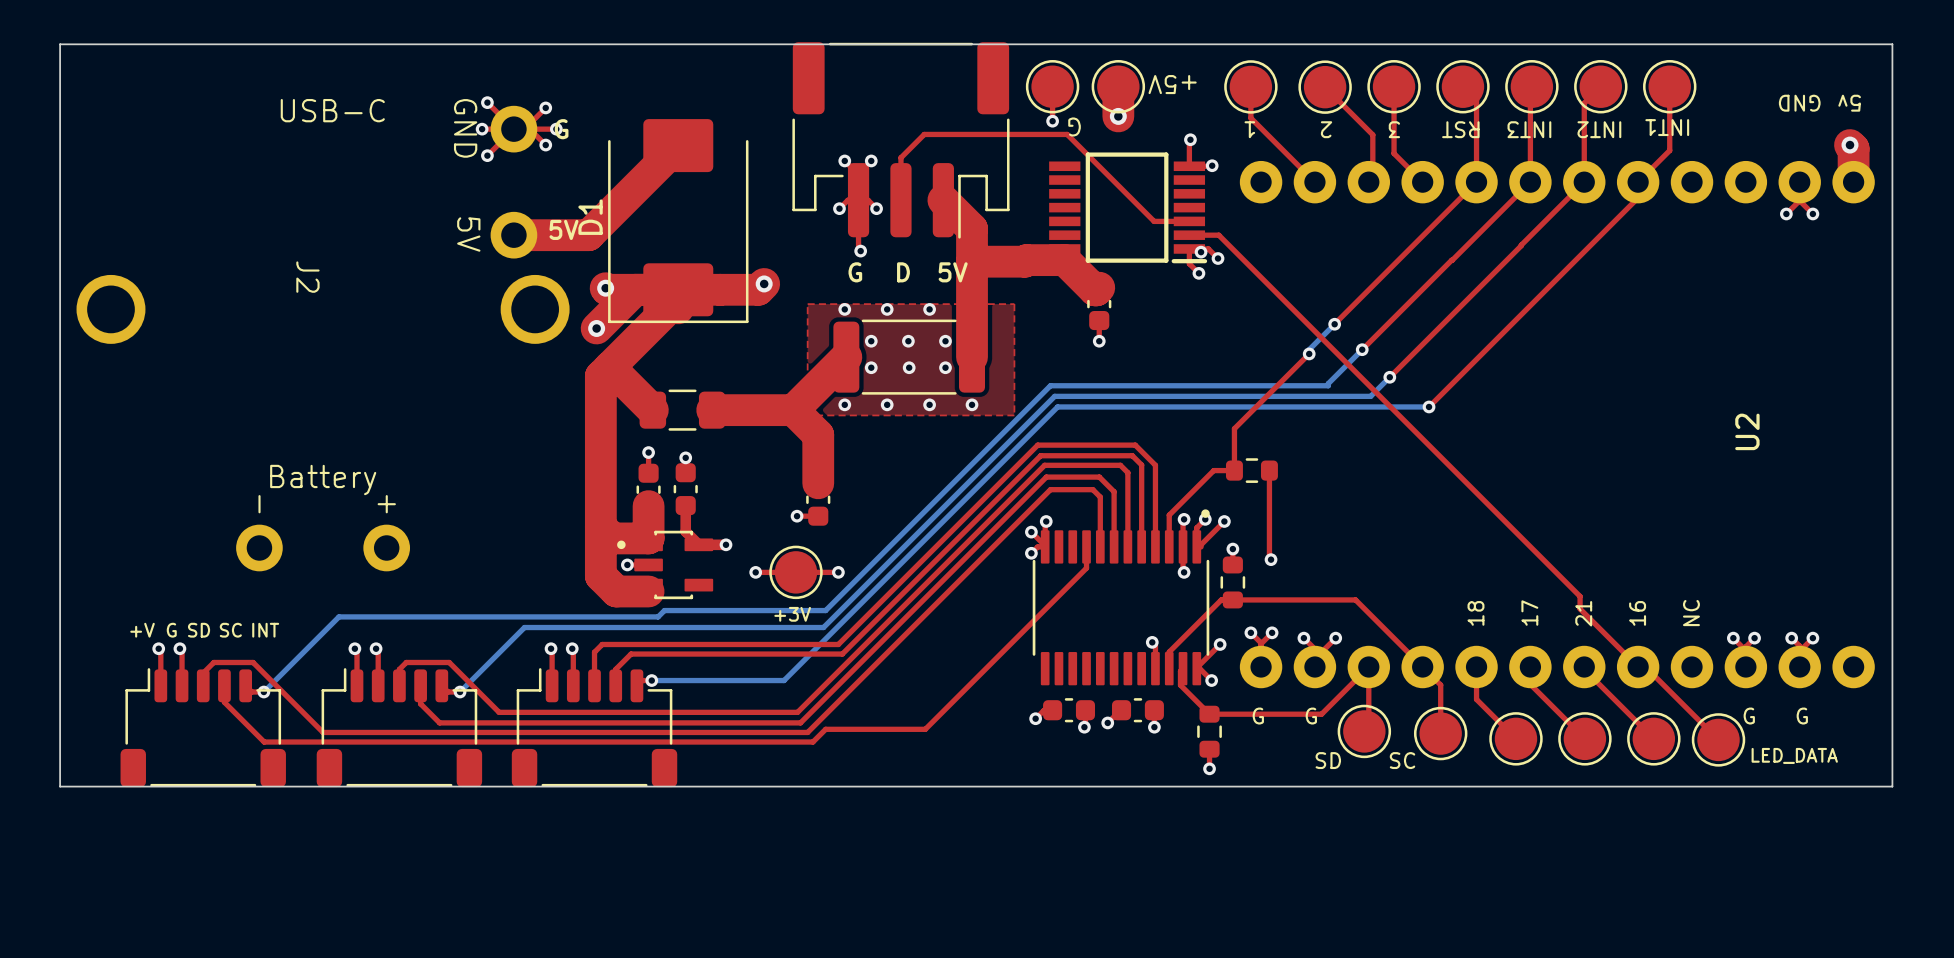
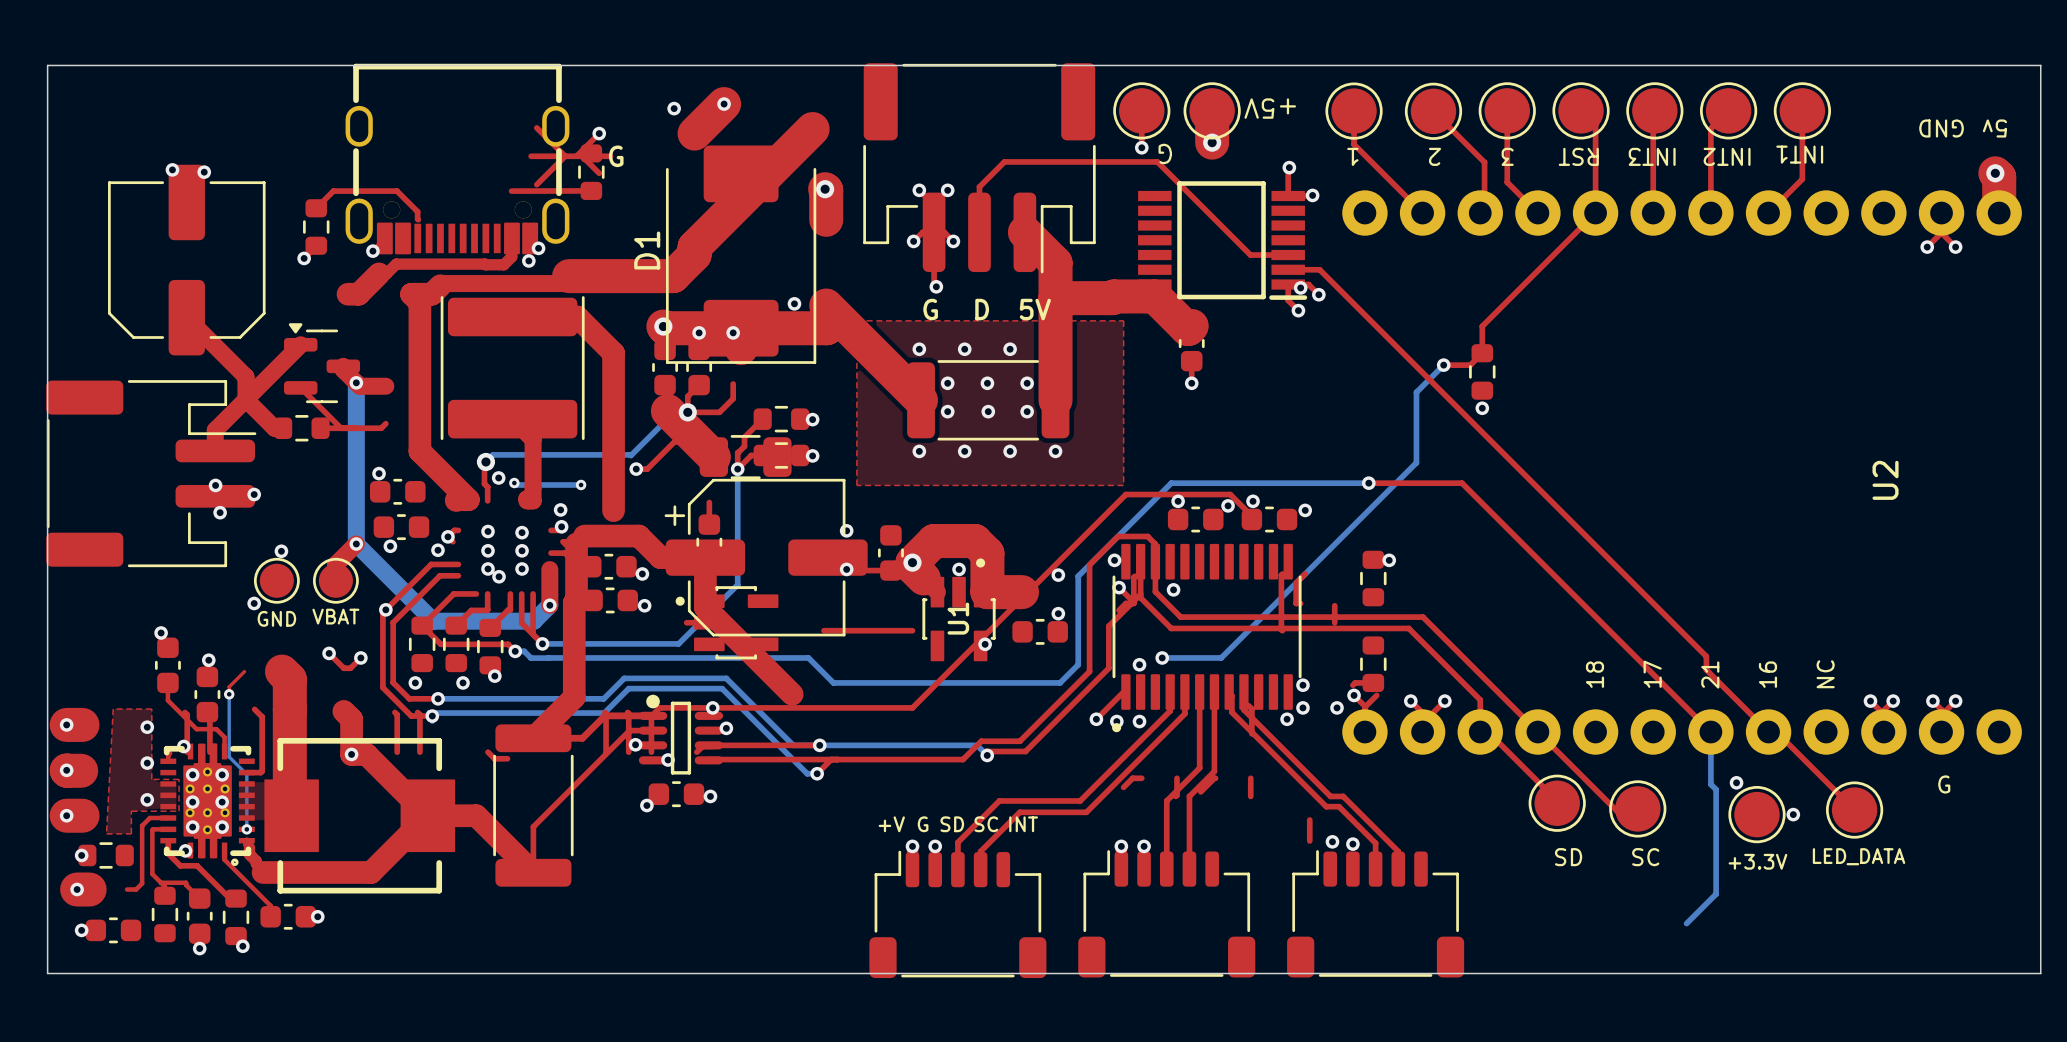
board edge: (60, 44) (60, 786) (1892, 786) -> (79, 65) (47, 65) (47, 973) (2040, 973) (2040, 860)
top track: none -> (724, 104) (694, 133)
via: none -> (724, 104)
via: none -> (674, 108)
via: (487, 102) -> none
top track: none -> (812, 129) (694, 247) (694, 254) (673, 276) (569, 276)
via: (482, 129) -> none
via: (556, 129) -> none
part: none -> (457, 159)
via: none -> (172, 169)
via: none -> (204, 172)
part: none -> (591, 172)
via: (545, 145) -> none
top track: (678, 145) (588, 235) (513, 235) -> none
via: (487, 155) -> none
top track: none -> (825, 189) (826, 219)
via: none -> (825, 189)
top track: none -> (511, 191) (591, 190)
top track: none -> (316, 208) (333, 191) (397, 191) (417, 211) (418, 219)
top track: (1530, 182) (1362, 349) -> none
top track: (1584, 182) (1389, 377) -> none
part: none -> (316, 227)
top track: (1638, 197) (1429, 406) -> none
top track: none -> (511, 238) (511, 256) (503, 264) (396, 264) (386, 273) (379, 273) (358, 294) (347, 294)
via: none -> (538, 248)
via: none -> (372, 251)
via: none -> (304, 258)
part: none -> (186, 260)
via: none -> (528, 260)
text: 5V (563, 229) -> none
top track: none -> (569, 283) (442, 283) (431, 294) (411, 294) (419, 302) (419, 451) (468, 499) (456, 500)
via: none -> (794, 303)
top track: none -> (826, 305) (921, 400) (921, 384)
top track: none -> (186, 317) (245, 376) (245, 399) (274, 428) (283, 428)
top track: none -> (512, 317) (577, 317) (613, 353) (613, 510)
via: (764, 283) -> none
top track: (1370, 287) (1334, 324) -> (1482, 326) (1482, 353) (1470, 365) (1443, 365)
top track: (635, 289) (596, 328) -> none
via: none -> (699, 332)
via: none -> (733, 332)
top track: (678, 298) (600, 376) (600, 575) (616, 591) (648, 591) -> none
top zone outline: (807, 304) (1014, 304) (1014, 415) (807, 415) (807, 304) -> (856, 320) (856, 485) (1123, 485) (1123, 320) (856, 320)
top track: none -> (300, 344) (215, 430) (215, 450)
part: none -> (322, 363)
top track: none -> (343, 366) (343, 369) (359, 386) (385, 386)
part: none -> (665, 367)
part: none -> (699, 367)
part: none -> (512, 368)
via position: (596, 328) -> (687, 412)
part: none -> (1482, 371)
J2: (323, 338) -> none
bottom track: none -> (356, 382) (356, 544) (433, 621) (533, 621) (549, 605)
via: none -> (356, 382)
top track: none -> (733, 383) (733, 398) (719, 412) (687, 412) (687, 396) (699, 385)
top track: none -> (300, 387) (341, 428)
bottom track: (1362, 349) (1328, 385) (1050, 385) (825, 610) (664, 610) (658, 616) -> (987, 755) (977, 745) (793, 745) (726, 678) (719, 678)
via: (1362, 349) -> none
top track: (1309, 353) (1234, 428) (1234, 470) (1213, 470) (1169, 515) (1169, 546) -> none
bottom track: none -> (1416, 396) (1416, 462) (1221, 657) (1162, 657)
via: (1309, 353) -> none
top track: (846, 357) (793, 410) -> none
via: none -> (1482, 408)
bottom track: none -> (687, 412) (674, 412) (631, 455) (493, 454) (485, 461)
top track: none -> (512, 419) (533, 439) (533, 500) (526, 498) (526, 500)
top track: none -> (762, 419) (744, 437) (744, 446) (737, 452) (737, 469) (751, 455) (762, 455)
part: none -> (781, 419)
via: none -> (812, 419)
bottom track: (1389, 377) (1370, 396) (1054, 396) (823, 627) (524, 627) (460, 692) -> none
via: (1389, 377) -> none
top track: none -> (385, 423) (381, 428) (320, 428)
part: none -> (301, 428)
top track: none -> (689, 441) (674, 441) (647, 469) (636, 469)
bottom track: (1429, 406) (1057, 406) (784, 680) (651, 680) -> none
via: (1429, 406) -> none
part: none -> (781, 455)
via: none -> (812, 455)
top track: (712, 410) (793, 410) -> none
top track: (793, 410) (818, 435) (818, 483) -> none
top track: none -> (485, 461) (484, 483) (487, 487) (487, 500)
via: none -> (485, 461)
via: none -> (636, 469)
bottom track: none -> (737, 469) (737, 584) (678, 643) (542, 643)
via: none -> (737, 469)
part: none -> (151, 473)
via: none -> (379, 473)
via: none -> (498, 477)
bottom track: none -> (514, 483) (516, 484) (581, 484)
via: none -> (514, 483)
top track: none -> (1368, 483) (1462, 483) (1710, 732)
bottom track: none -> (1368, 483) (1171, 483) (1078, 576) (1078, 664) (1060, 682) (833, 682) (808, 657) (548, 657)
via: none -> (1368, 483)
via: none -> (215, 485)
via: none -> (581, 484)
part: none -> (397, 491)
via: none -> (254, 494)
via: none -> (1178, 501)
via: none -> (1253, 501)
via: (648, 452) -> none
via: none -> (1228, 505)
via: (685, 457) -> none
via: none -> (560, 509)
via: none -> (1305, 510)
via: none -> (220, 512)
part: none -> (1195, 519)
top track: (1155, 468) (1155, 546) -> none
part: none -> (1269, 519)
part: (1251, 470) -> none
top track: (1269, 470) (1269, 558) (1271, 559) -> none
part: none -> (401, 527)
top track: none -> (561, 526) (558, 530) (551, 530)
via: none -> (561, 526)
top track: none -> (458, 530) (454, 530) (447, 536) (452, 541)
via: none -> (488, 531)
via: none -> (846, 530)
via: none -> (522, 532)
top track: none -> (584, 536) (638, 536) (660, 557) (705, 557) (705, 607) (792, 694)
via: none -> (447, 536)
top track: none -> (562, 541) (567, 546) (565, 541)
part: (685, 489) -> none
top track: none -> (356, 544) (335, 564) (335, 580)
via: none -> (356, 544)
top track: none -> (576, 544) (574, 697) (533, 738) (582, 738) (604, 715) (653, 715)
via: none -> (390, 546)
via: none -> (437, 550)
via: none -> (488, 550)
via: none -> (522, 550)
via: none -> (281, 551)
top track: none -> (551, 553) (576, 553)
part: none -> (766, 557)
top track: (685, 505) (685, 531) (698, 544) (726, 544) -> none
top track: (648, 506) (648, 538) (612, 538) (600, 526) -> none
via: none -> (1114, 560)
via: none -> (1389, 560)
top track: none -> (1140, 561) (1140, 597) (1171, 628) (1408, 628) (1480, 699) (1480, 732) (1488, 732) (1568, 812)
via: none -> (912, 562)
top track: none -> (458, 564) (431, 564) (382, 612) (382, 687) (411, 716) (432, 716)
part: none -> (608, 566)
via: none -> (488, 568)
via: none -> (522, 568)
top track: none -> (549, 569) (549, 605)
via: none -> (959, 569)
via position: (797, 516) -> (846, 569)
via: none -> (642, 573)
via: (1184, 519) -> none
via: (1205, 519) -> none
via: none -> (1058, 575)
top track: none -> (458, 575) (440, 575) (393, 622) (393, 682) (409, 698) (438, 698)
via: none -> (499, 576)
via: (1046, 521) -> none
top track: (1224, 521) (1198, 546) -> (1123, 692) (1096, 719)
via: (1224, 521) -> none
part: none -> (1373, 578)
part: none -> (276, 580)
part: none -> (335, 580)
via: none -> (1173, 589)
top track: none -> (937, 592) (912, 567) (912, 562) (934, 541) (974, 541) (987, 553) (987, 592) (1022, 592)
top track: none -> (476, 593) (453, 593) (422, 625) (440, 644) (508, 644) (515, 651)
top track: none -> (487, 593) (487, 609) (471, 610) (456, 625)
top track: none -> (510, 593) (510, 609) (490, 627)
top track: none -> (521, 593) (521, 623) (542, 643)
top track: none -> (533, 593) (533, 634)
top track: none -> (1140, 594) (1108, 626) (1108, 668) (1025, 751) (985, 751) (987, 755)
part: none -> (610, 600)
via: (726, 544) -> none
via: none -> (254, 603)
top track: (1086, 546) (1086, 568) (925, 729) (825, 729) (812, 742) (264, 742) (224, 702) (224, 685) -> none
top track: (1100, 546) (1100, 497) (1092, 489) (1050, 489) (807, 732) (323, 732) (253, 662) (213, 662) (203, 673) (203, 685) -> none
top track: (1114, 546) (1114, 491) (1099, 477) (1046, 477) (800, 722) (439, 722) (420, 703) (420, 685) -> none
top track: (1127, 546) (1127, 472) (1120, 465) (1044, 465) (797, 712) (499, 712) (449, 662) (406, 662) (399, 669) (399, 685) -> none
top track: (1141, 546) (1141, 465) (1132, 455) (1040, 455) (842, 654) (631, 654) (615, 669) (615, 685) -> none
via: none -> (549, 605)
via: none -> (644, 605)
via: (1232, 549) -> none
via: none -> (385, 609)
U1: none -> (959, 609)
via: (1031, 553) -> none
via: none -> (1058, 613)
via: (1271, 559) -> none
via: (627, 564) -> none
via: (755, 572) -> none
part: (795, 572) -> none
via: (838, 572) -> none
via: (1184, 572) -> none
part: none -> (1040, 631)
via: none -> (161, 632)
part: (1232, 582) -> none
via: none -> (542, 643)
part: none -> (422, 644)
part: none -> (456, 644)
via: none -> (985, 644)
part: none -> (490, 646)
bottom track: none -> (515, 651) (524, 651) (531, 658) (548, 658)
via: none -> (515, 651)
top track: none -> (329, 653) (343, 668) (350, 668) (360, 657)
via: none -> (329, 653)
via: none -> (360, 657)
via: none -> (1162, 657)
part rotation: 0° (1121, 597) -> 180° (1206, 638)
via: none -> (208, 660)
top track: (1355, 599) (1221, 599) (1169, 652) (1169, 668) -> (1466, 660) (1423, 617) (1180, 617) (1155, 591) (1155, 544) (1147, 536) (1117, 536) (1089, 564) (1089, 671) (1019, 741) (981, 741) (963, 759) (708, 760)
part: none -> (1373, 664)
part: none -> (167, 665)
via: none -> (1139, 664)
top track: none -> (244, 671) (229, 686) (229, 694)
top track: none -> (281, 671) (289, 679) (289, 813) (291, 815)
via: none -> (494, 676)
bottom track: (569, 616) (338, 616) (263, 692) -> (624, 678) (603, 698) (438, 698)
top track: none -> (167, 682) (167, 700) (196, 729) (216, 729) (224, 737) (224, 751)
via: none -> (415, 682)
via: none -> (463, 682)
top track: none -> (1373, 682) (1355, 682) (1352, 685)
via: none -> (1302, 685)
top track: none -> (1170, 692) (1170, 710) (1080, 800) (999, 800) (957, 842) (957, 869)
top track: none -> (1184, 692) (1184, 713) (1086, 812) (1019, 812) (980, 851) (980, 869)
top track: none -> (1199, 692) (1199, 768) (1166, 800) (1166, 869)
top track: none -> (1214, 692) (1214, 771) (1189, 796) (1189, 869)
top track: none -> (1229, 692) (1231, 695) (1231, 712) (1326, 806) (1339, 806) (1375, 843) (1375, 869)
top track: none -> (1243, 692) (1243, 709) (1330, 796) (1343, 796) (1398, 851) (1398, 869)
text: +V (142, 630) -> none
text: G (171, 630) -> none
text: SD (199, 630) -> none
text: SC (230, 630) -> none
text: INT (265, 630) -> none
part: none -> (207, 694)
bottom track: none -> (229, 694) (229, 756) (246, 774) (246, 829)
via: none -> (229, 694)
via: (1272, 632) -> none
via: none -> (438, 698)
via: (1152, 642) -> none
via: none -> (712, 707)
via: none -> (1302, 707)
top track: (1220, 644) (1196, 667) (1211, 680) -> none
via: (1220, 644) -> none
via: none -> (1337, 707)
top zone outline: none -> (113, 709) (151, 709) (151, 779) (179, 779) (179, 811) (131, 811) (131, 833) (106, 833) (113, 709)
top track: none -> (254, 709) (262, 716) (262, 771) (246, 772)
top track: none -> (343, 711) (351, 719) (351, 754) (366, 754) (427, 815)
via: (158, 648) -> none
via: (179, 648) -> none
via: (354, 648) -> none
via: (376, 648) -> none
via: (551, 648) -> none
via: (572, 648) -> none
via: none -> (432, 716)
via: none -> (1096, 719)
via: none -> (1287, 719)
bottom track: none -> (432, 721) (432, 716) (429, 713) (604, 713) (628, 688) (722, 688) (807, 773) (816, 774)
via: none -> (1116, 721)
via: none -> (1139, 721)
top track: none -> (66, 724) (82, 724)
via: none -> (66, 724)
via: none -> (147, 727)
via: none -> (726, 728)
top track: none -> (653, 730) (629, 730) (533, 826) (533, 872) (476, 815) (427, 815)
top track: (1476, 667) (1476, 699) (1515, 738) -> none
bottom track: none -> (1710, 732) (1710, 784) (1716, 789) (1716, 894) (1686, 923)
top track: (1183, 668) (1180, 671) (1180, 685) (1209, 714) (1321, 714) (1368, 667) (1368, 726) (1364, 731) -> none
part: none -> (680, 734)
top track: (1584, 669) (1653, 738) -> none
via: none -> (635, 744)
top track: none -> (708, 745) (819, 745)
via: none -> (819, 745)
via: none -> (183, 746)
via: (651, 680) -> none
via: (1211, 680) -> none
top track: (1530, 684) (1584, 738) -> none
top track: (1440, 685) (1440, 733) -> (1557, 751) (1618, 812) (1641, 812)
top track: none -> (170, 753) (168, 761)
via: none -> (351, 754)
via: none -> (987, 755)
via: (263, 692) -> none
via: (460, 692) -> none
top track: none -> (831, 759) (817, 773)
via: none -> (668, 759)
via: none -> (147, 763)
top track: none -> (66, 770) (81, 770)
via: none -> (66, 770)
via: none -> (817, 773)
via: none -> (192, 774)
via: none -> (222, 774)
part: (1069, 710) -> none
part: (1137, 710) -> none
via: none -> (1736, 782)
U2 text: G (1258, 716) -> none
U2 text: G (1311, 716) -> none
U2 text: G (1749, 716) -> none
via: (1035, 718) -> none
via: (1107, 722) -> none
part: none -> (676, 794)
part: (203, 727) -> none
part: (399, 727) -> none
part: (594, 727) -> none
via: none -> (710, 796)
via: (1084, 727) -> none
via: (1154, 727) -> none
via: none -> (147, 799)
part: (1209, 731) -> none
part: (1364, 731) -> none
via: none -> (192, 802)
via: none -> (222, 802)
part: none -> (207, 804)
part: none -> (533, 805)
via: none -> (646, 805)
part: (1584, 738) -> none
part: (1653, 738) -> none
part: none -> (1756, 814)
via: none -> (1793, 814)
top track: none -> (66, 815) (82, 815)
via: none -> (66, 815)
part: none -> (359, 815)
top track: none -> (427, 815) (371, 872) (263, 872) (249, 854) (246, 840)
top track: none -> (168, 818) (149, 818) (142, 825) (142, 883) (136, 889) (127, 889)
text: none -> +V (891, 824)
text: none -> G (923, 824)
text: none -> SD (952, 824)
text: none -> SC (986, 824)
text: none -> INT (1023, 824)
via: none -> (192, 827)
via: none -> (222, 827)
text position: LED_DATA (1794, 755) -> LED_DATA (1859, 856)
top track: none -> (168, 829) (152, 830) (152, 874) (164, 886) (164, 895)
via: none -> (246, 829)
U2 text position: SD (1328, 760) -> SD (1568, 857)
U2 text position: SC (1402, 760) -> SC (1645, 857)
top track: none -> (168, 840) (168, 853) (180, 865) (197, 865) (229, 898) (236, 898)
via: (1209, 768) -> none
via: none -> (1332, 841)
via: none -> (1352, 844)
via: none -> (912, 846)
via: none -> (935, 846)
via: none -> (1121, 846)
via: none -> (1144, 846)
top track: none -> (224, 850) (224, 859) (270, 905) (270, 916)
via: none -> (185, 850)
via: none -> (81, 855)
part: none -> (106, 855)
top track: none -> (161, 882) (186, 882) (199, 898)
top track: none -> (77, 889) (89, 889)
via: none -> (77, 889)
part: none -> (1166, 913)
part: none -> (1375, 913)
part: none -> (164, 914)
part: none -> (957, 914)
part: none -> (199, 916)
part: none -> (288, 916)
via: none -> (317, 916)
part: none -> (236, 917)
via: none -> (81, 930)
part: none -> (113, 930)
via: none -> (242, 946)
via: none -> (199, 948)

